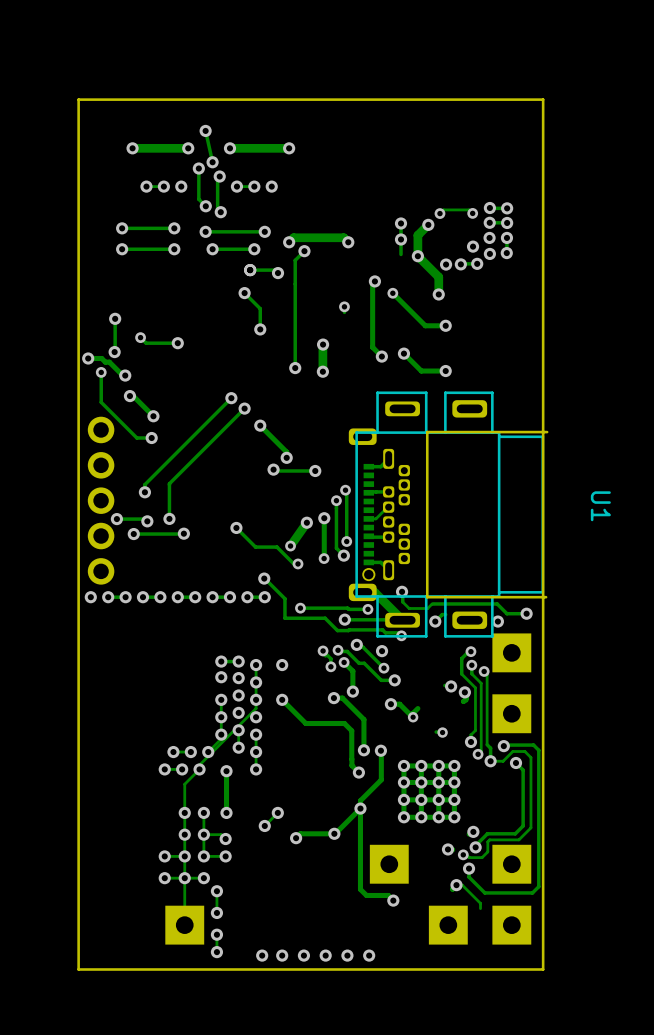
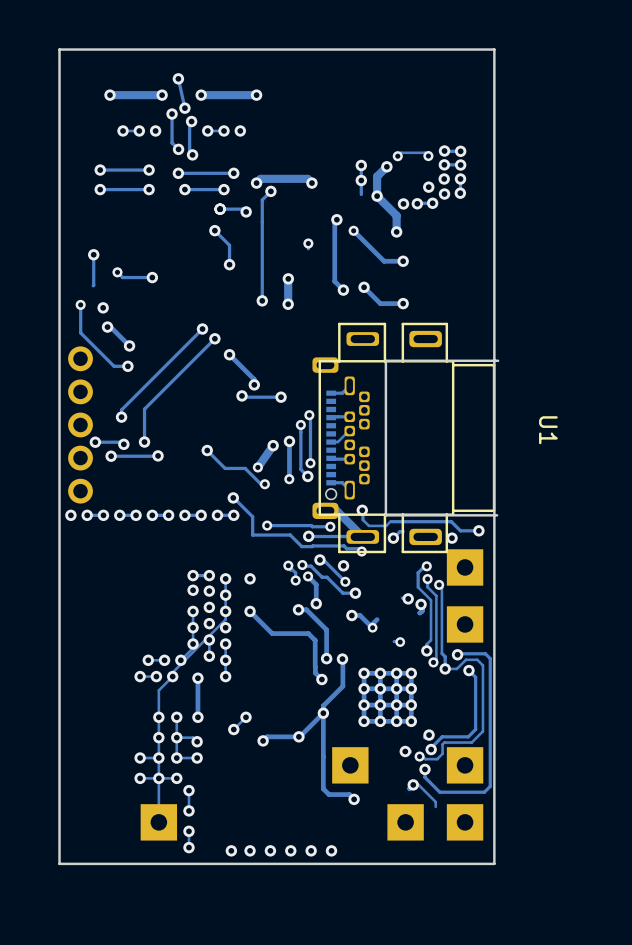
via: (114, 352) -> none
track: (88, 358) (101, 358) (105, 362) (109, 362) (122, 375) (125, 375) (123, 374) -> none
via: (88, 358) -> none

